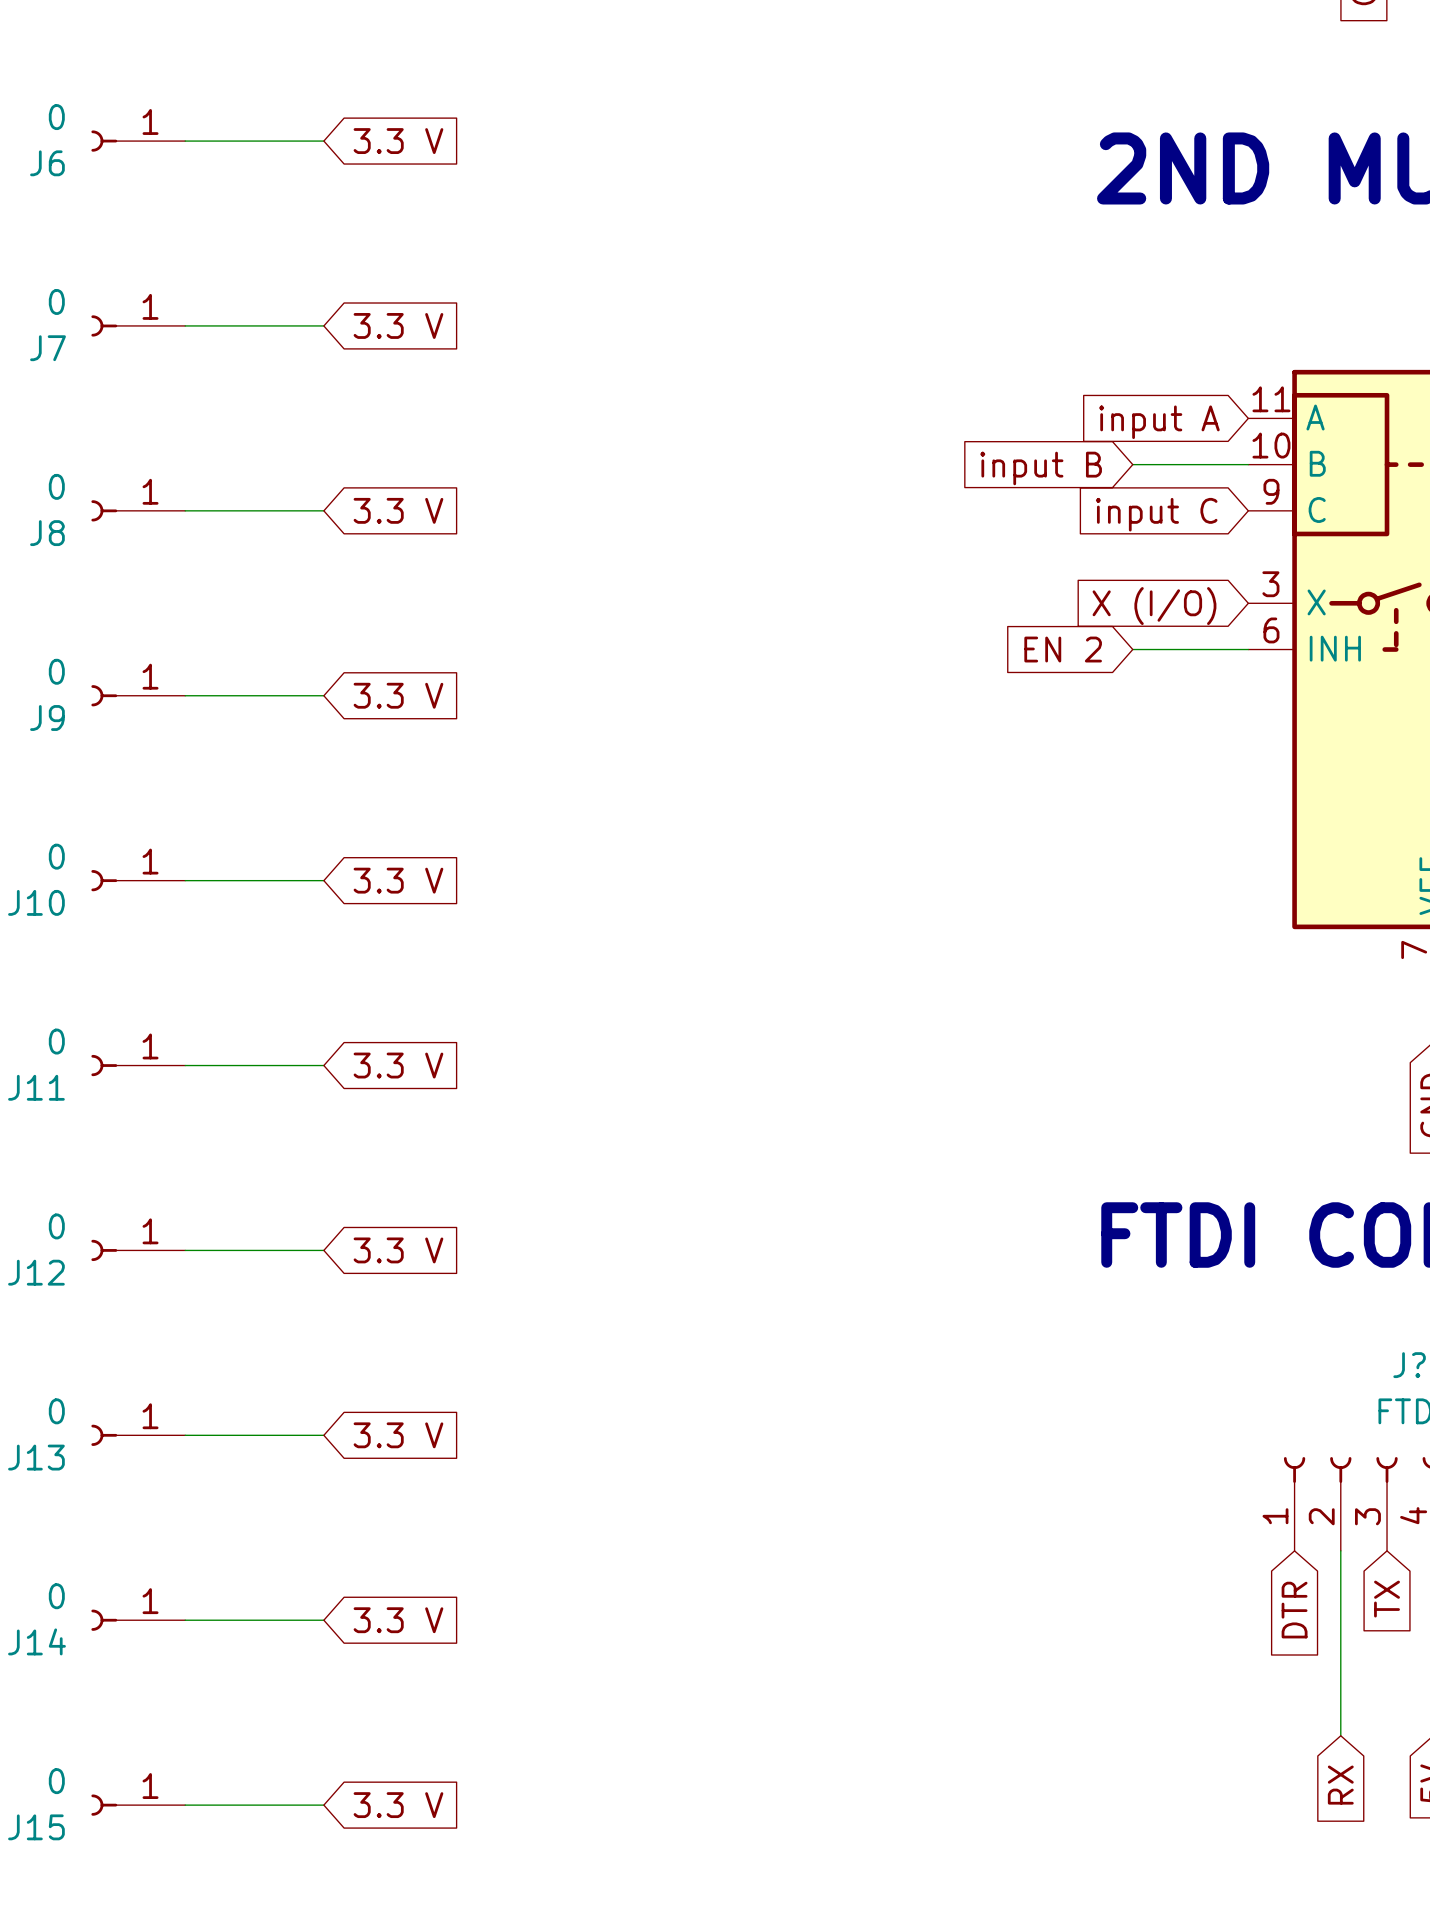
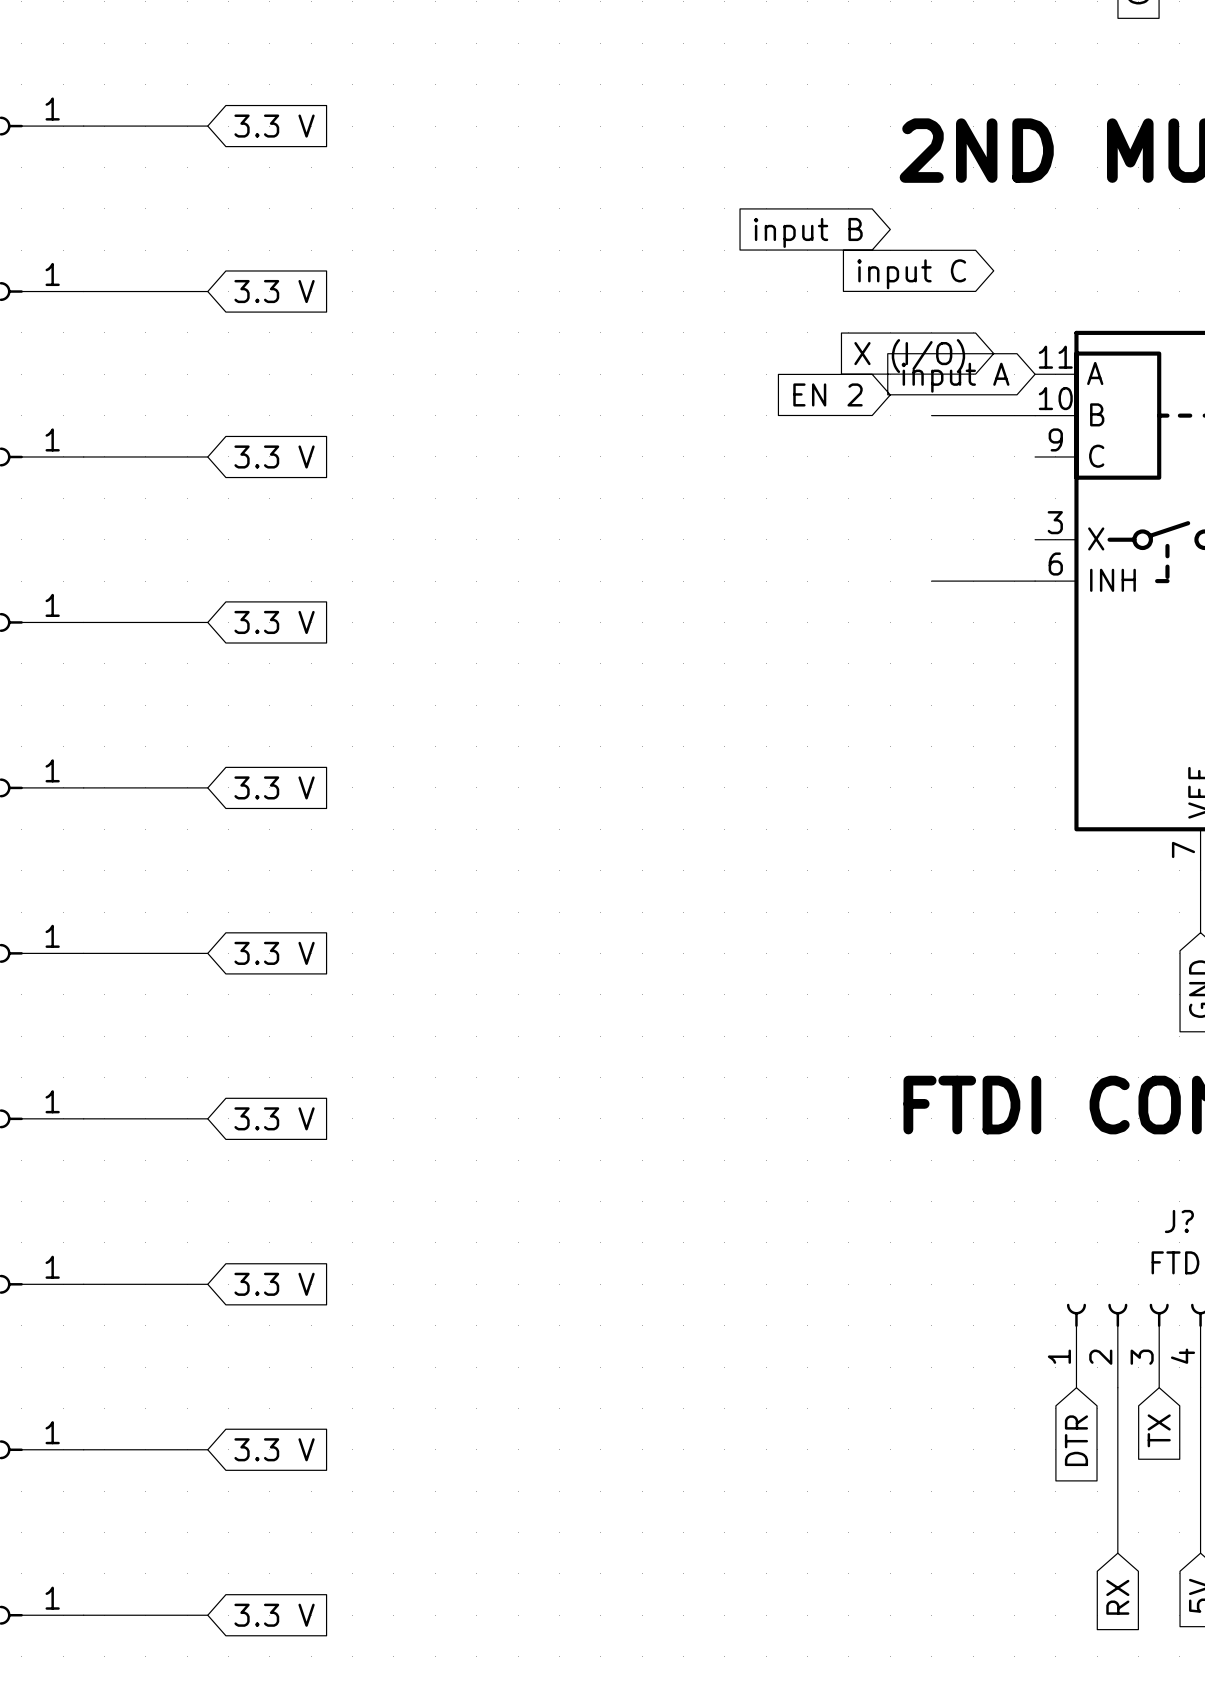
global label position: input B (1041, 468) -> input B (808, 232)
global label position: input C (1156, 514) -> input C (911, 274)
global label position: X (I/O) (1154, 606) -> X (I/O) (909, 356)
global label position: EN 2 (1063, 649) -> EN 2 (827, 394)

